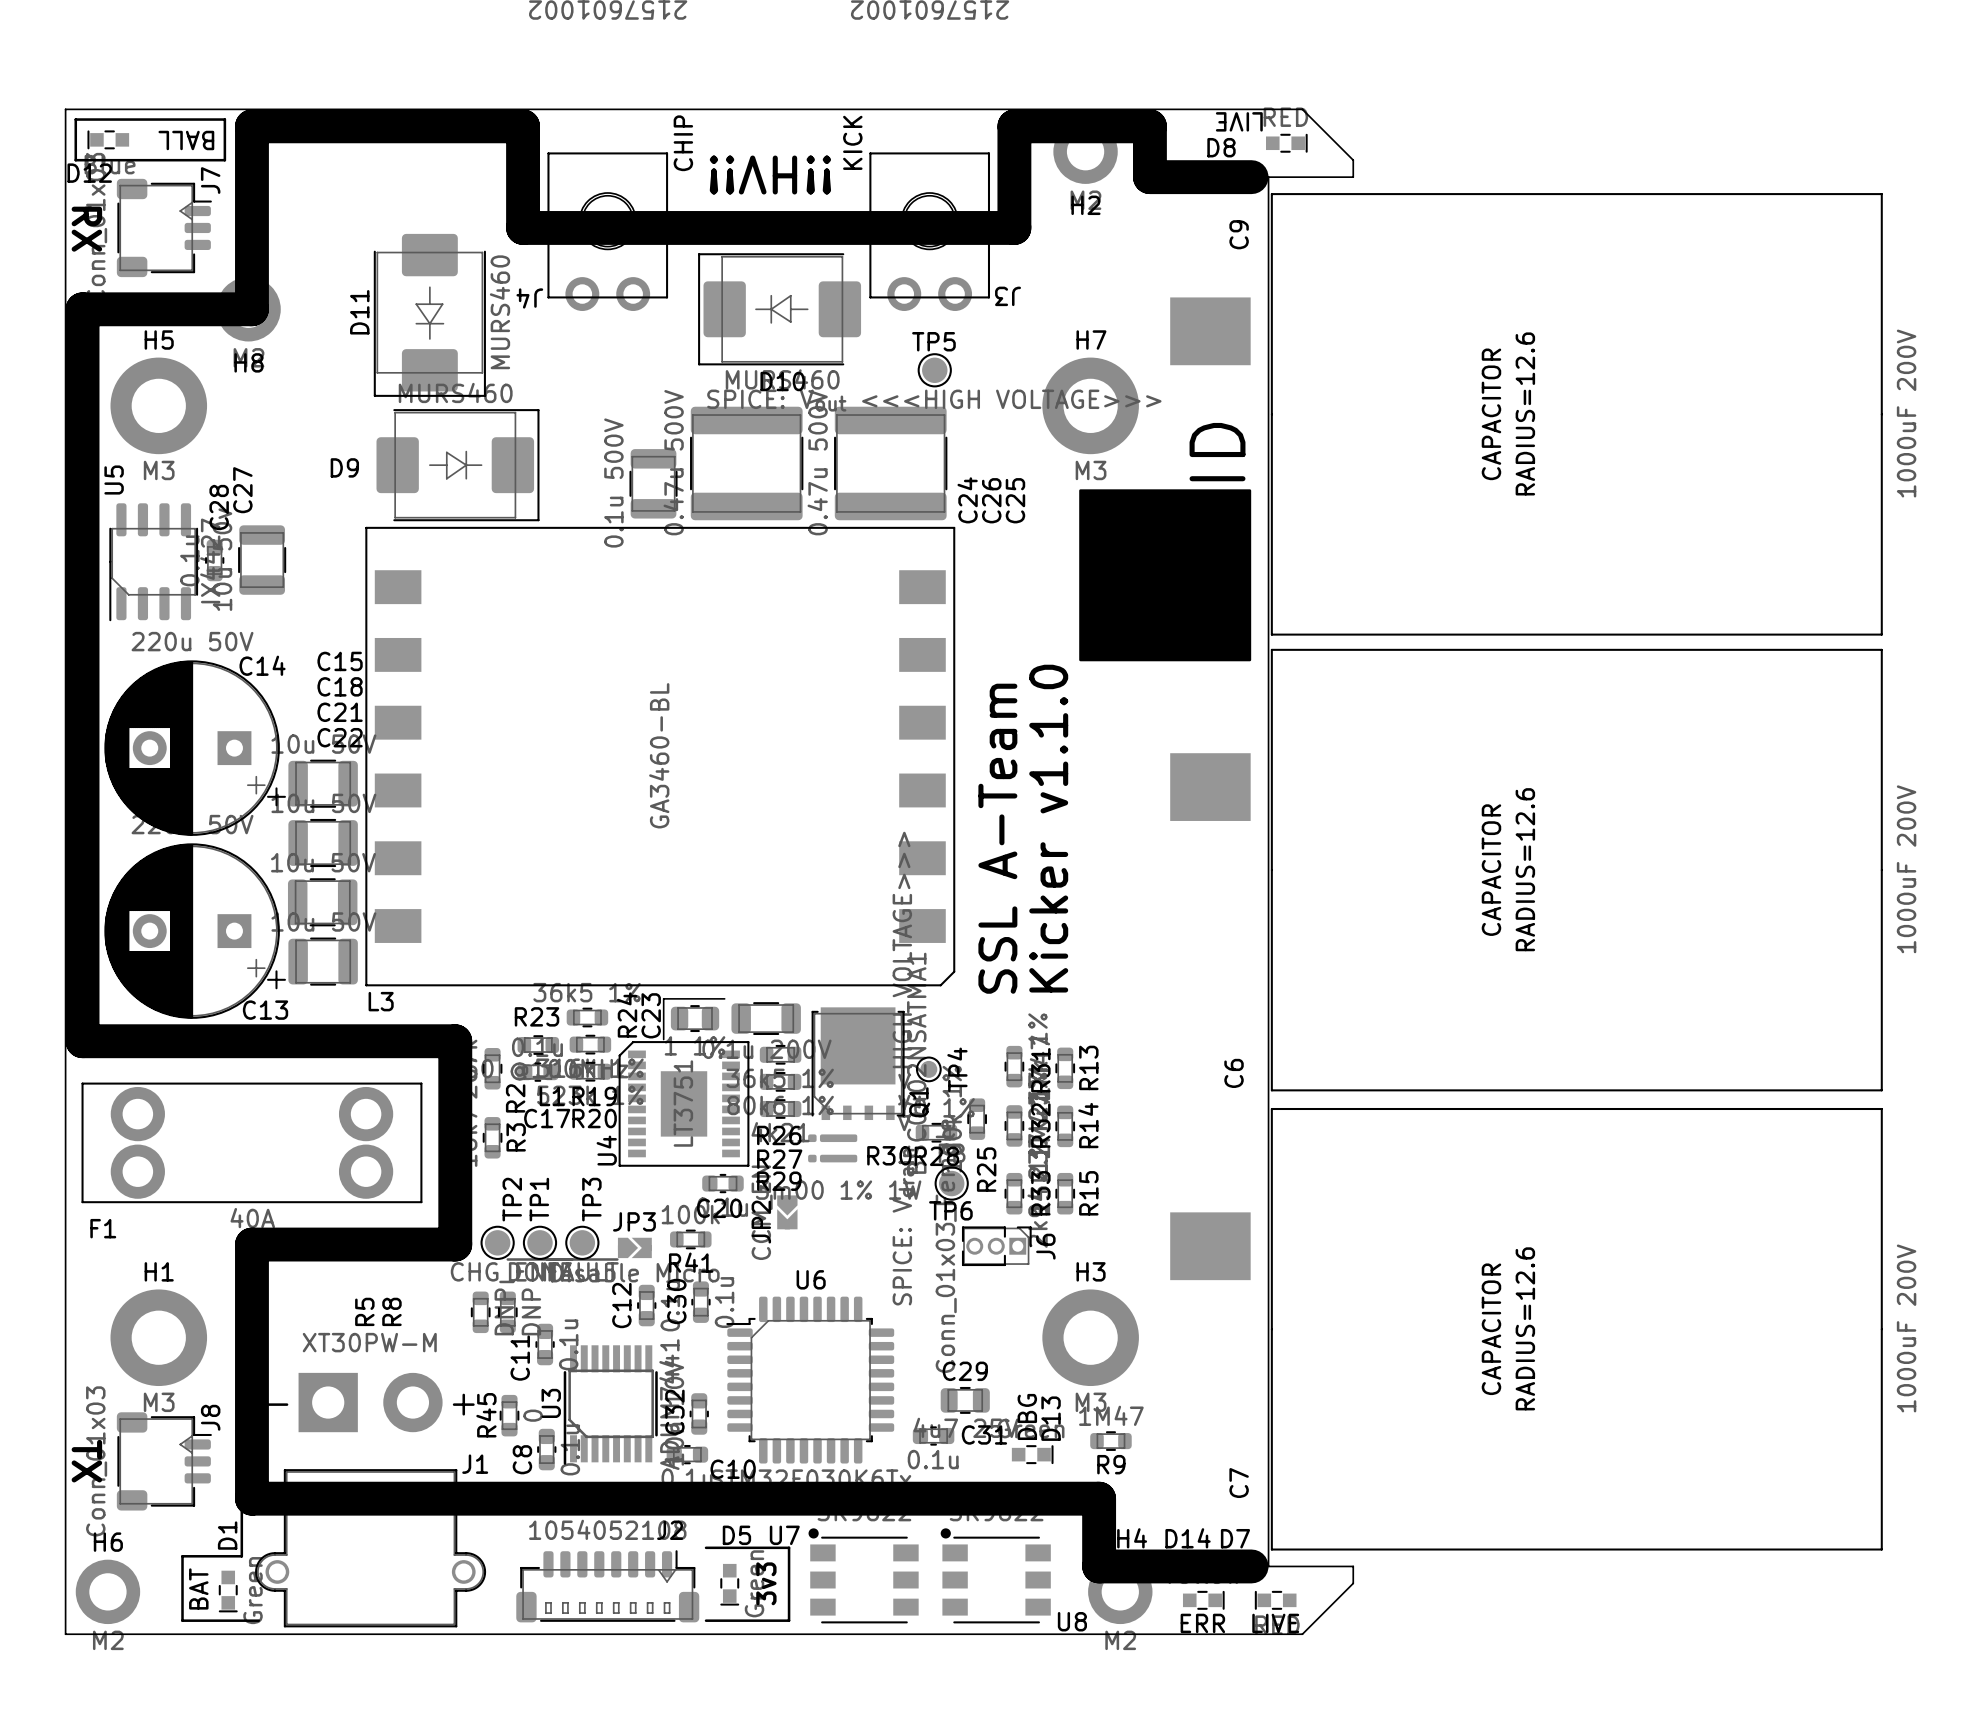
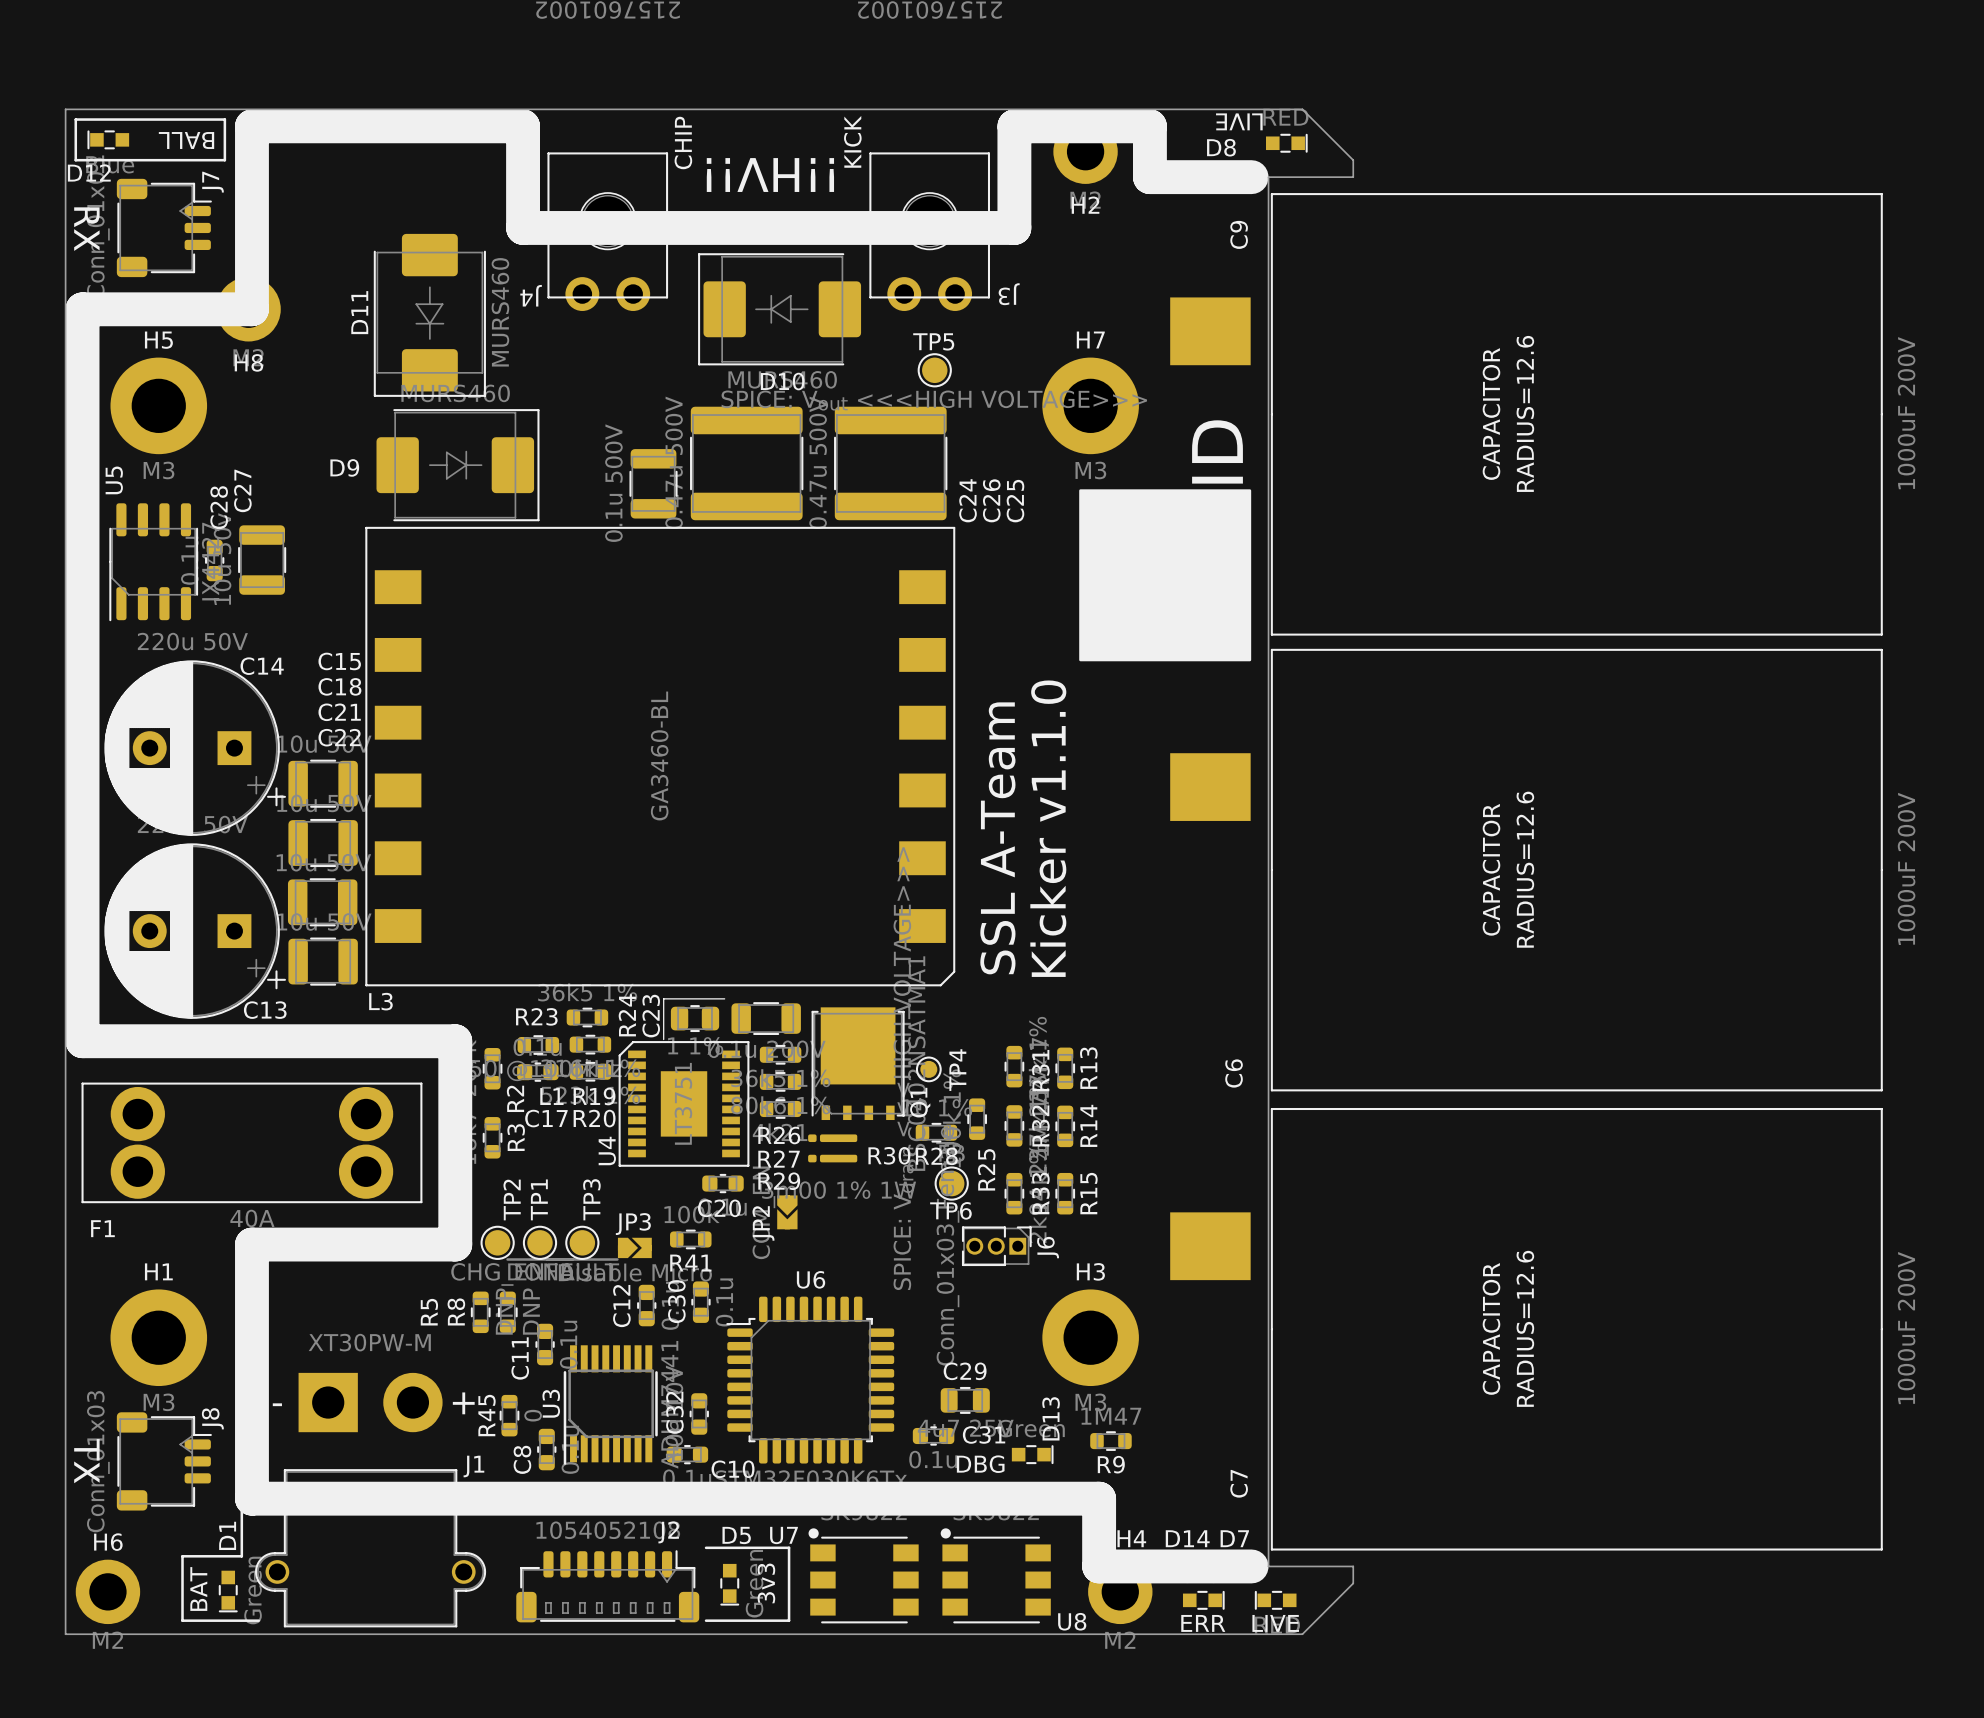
R5 name position: R5 (364, 1311) -> R5 (429, 1312)
R8 name position: R8 (391, 1311) -> R8 (456, 1311)
text rotation: 0° (1027, 1416) -> 90° clockwise (980, 1464)
text position: DBG (1027, 1416) -> DBG (980, 1464)

